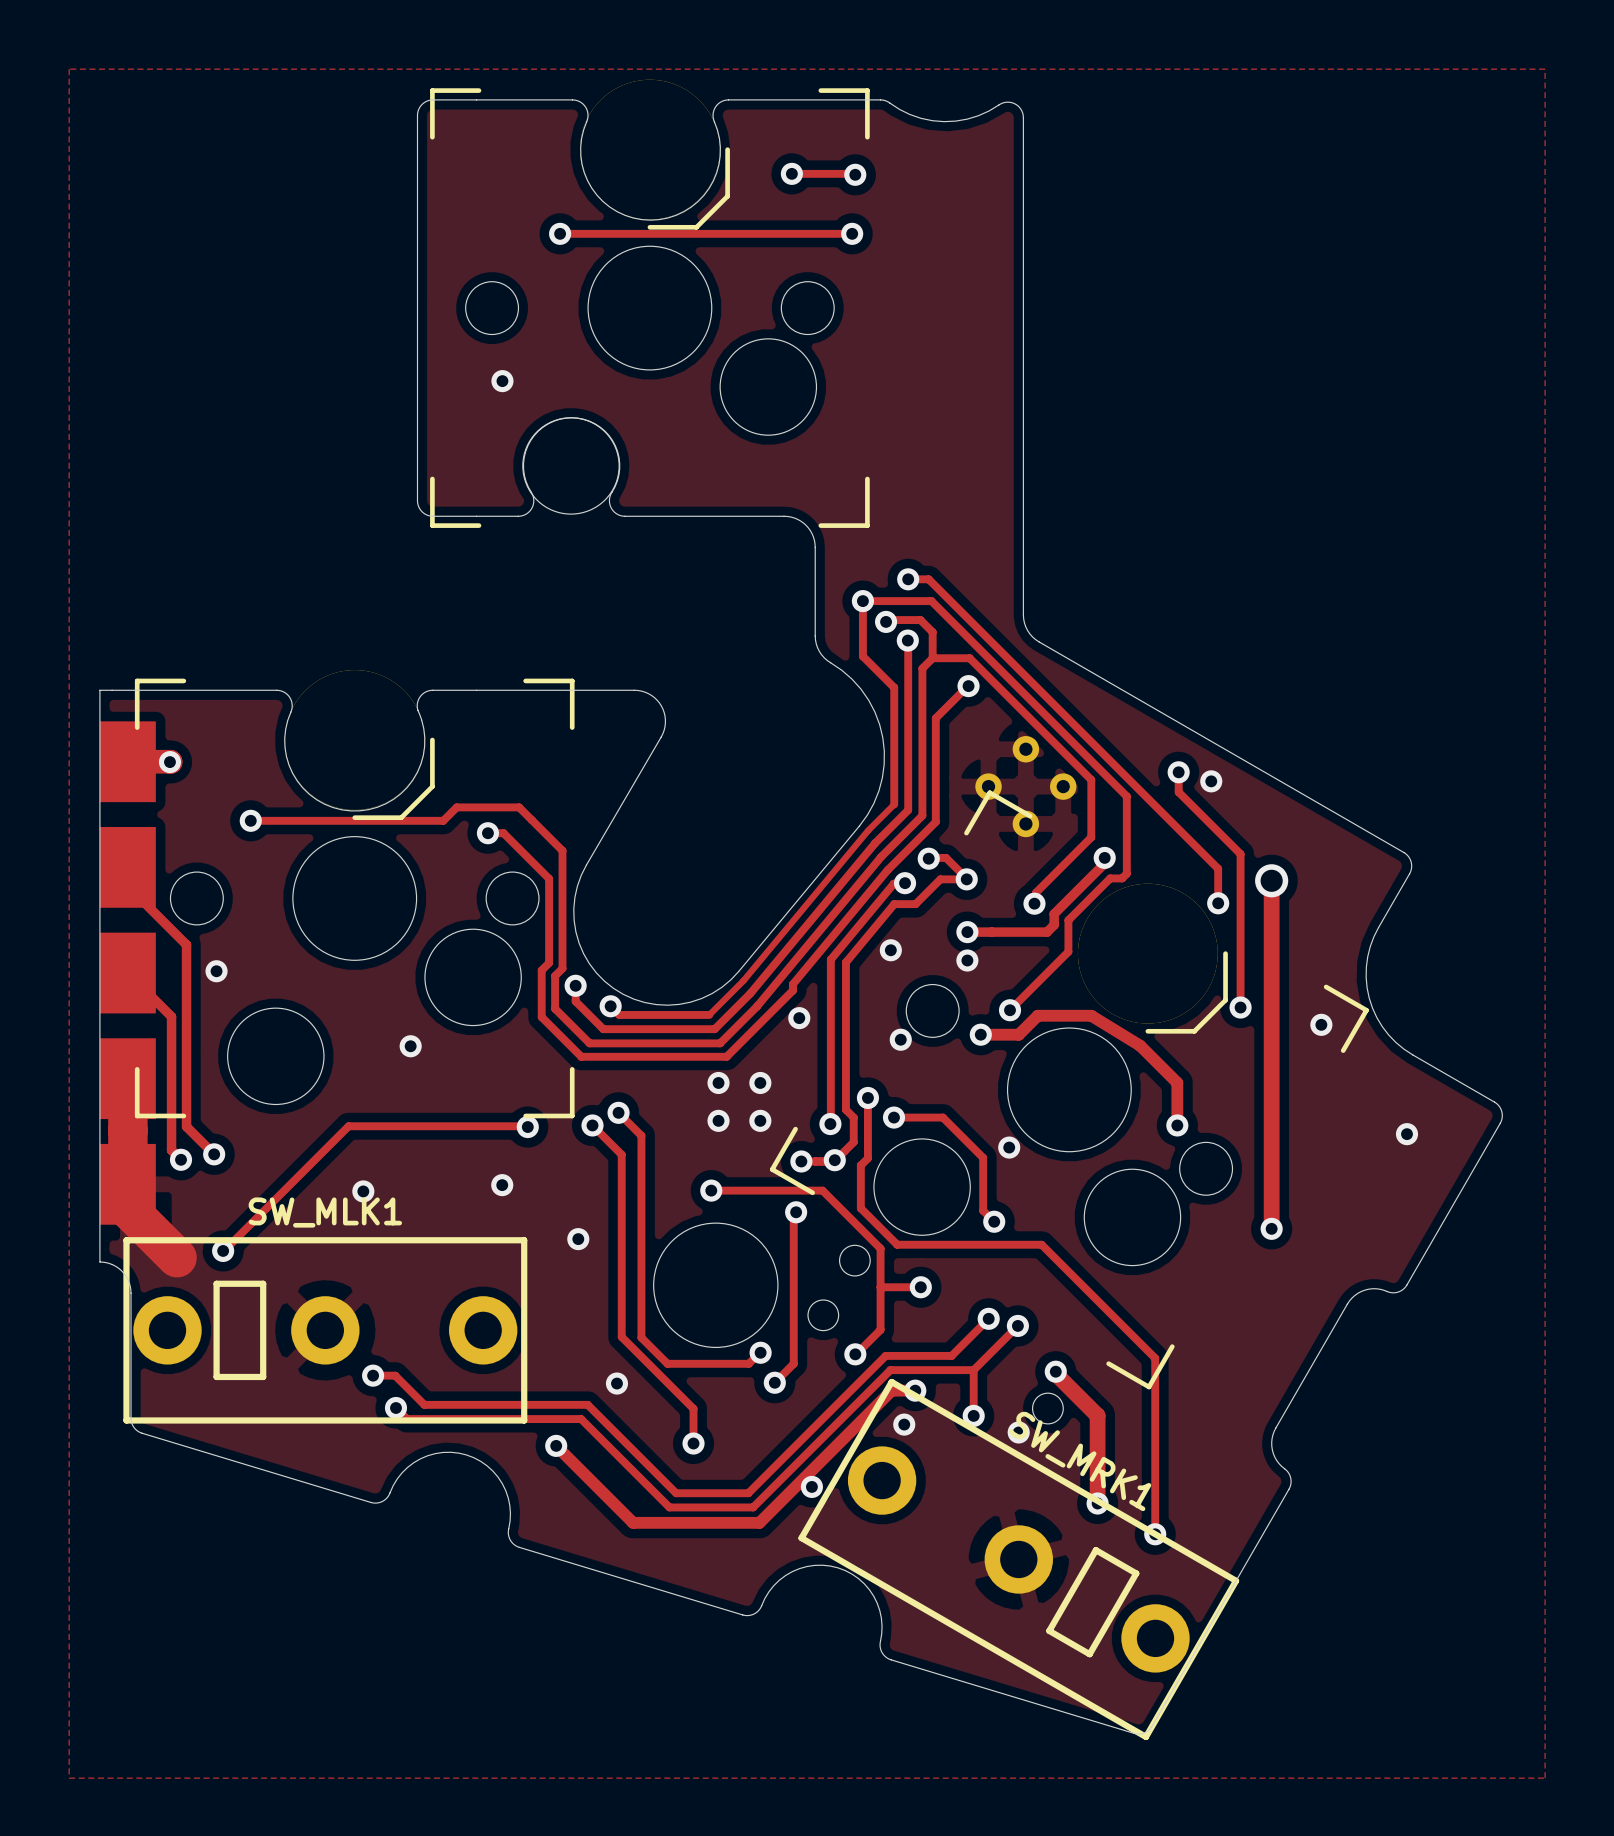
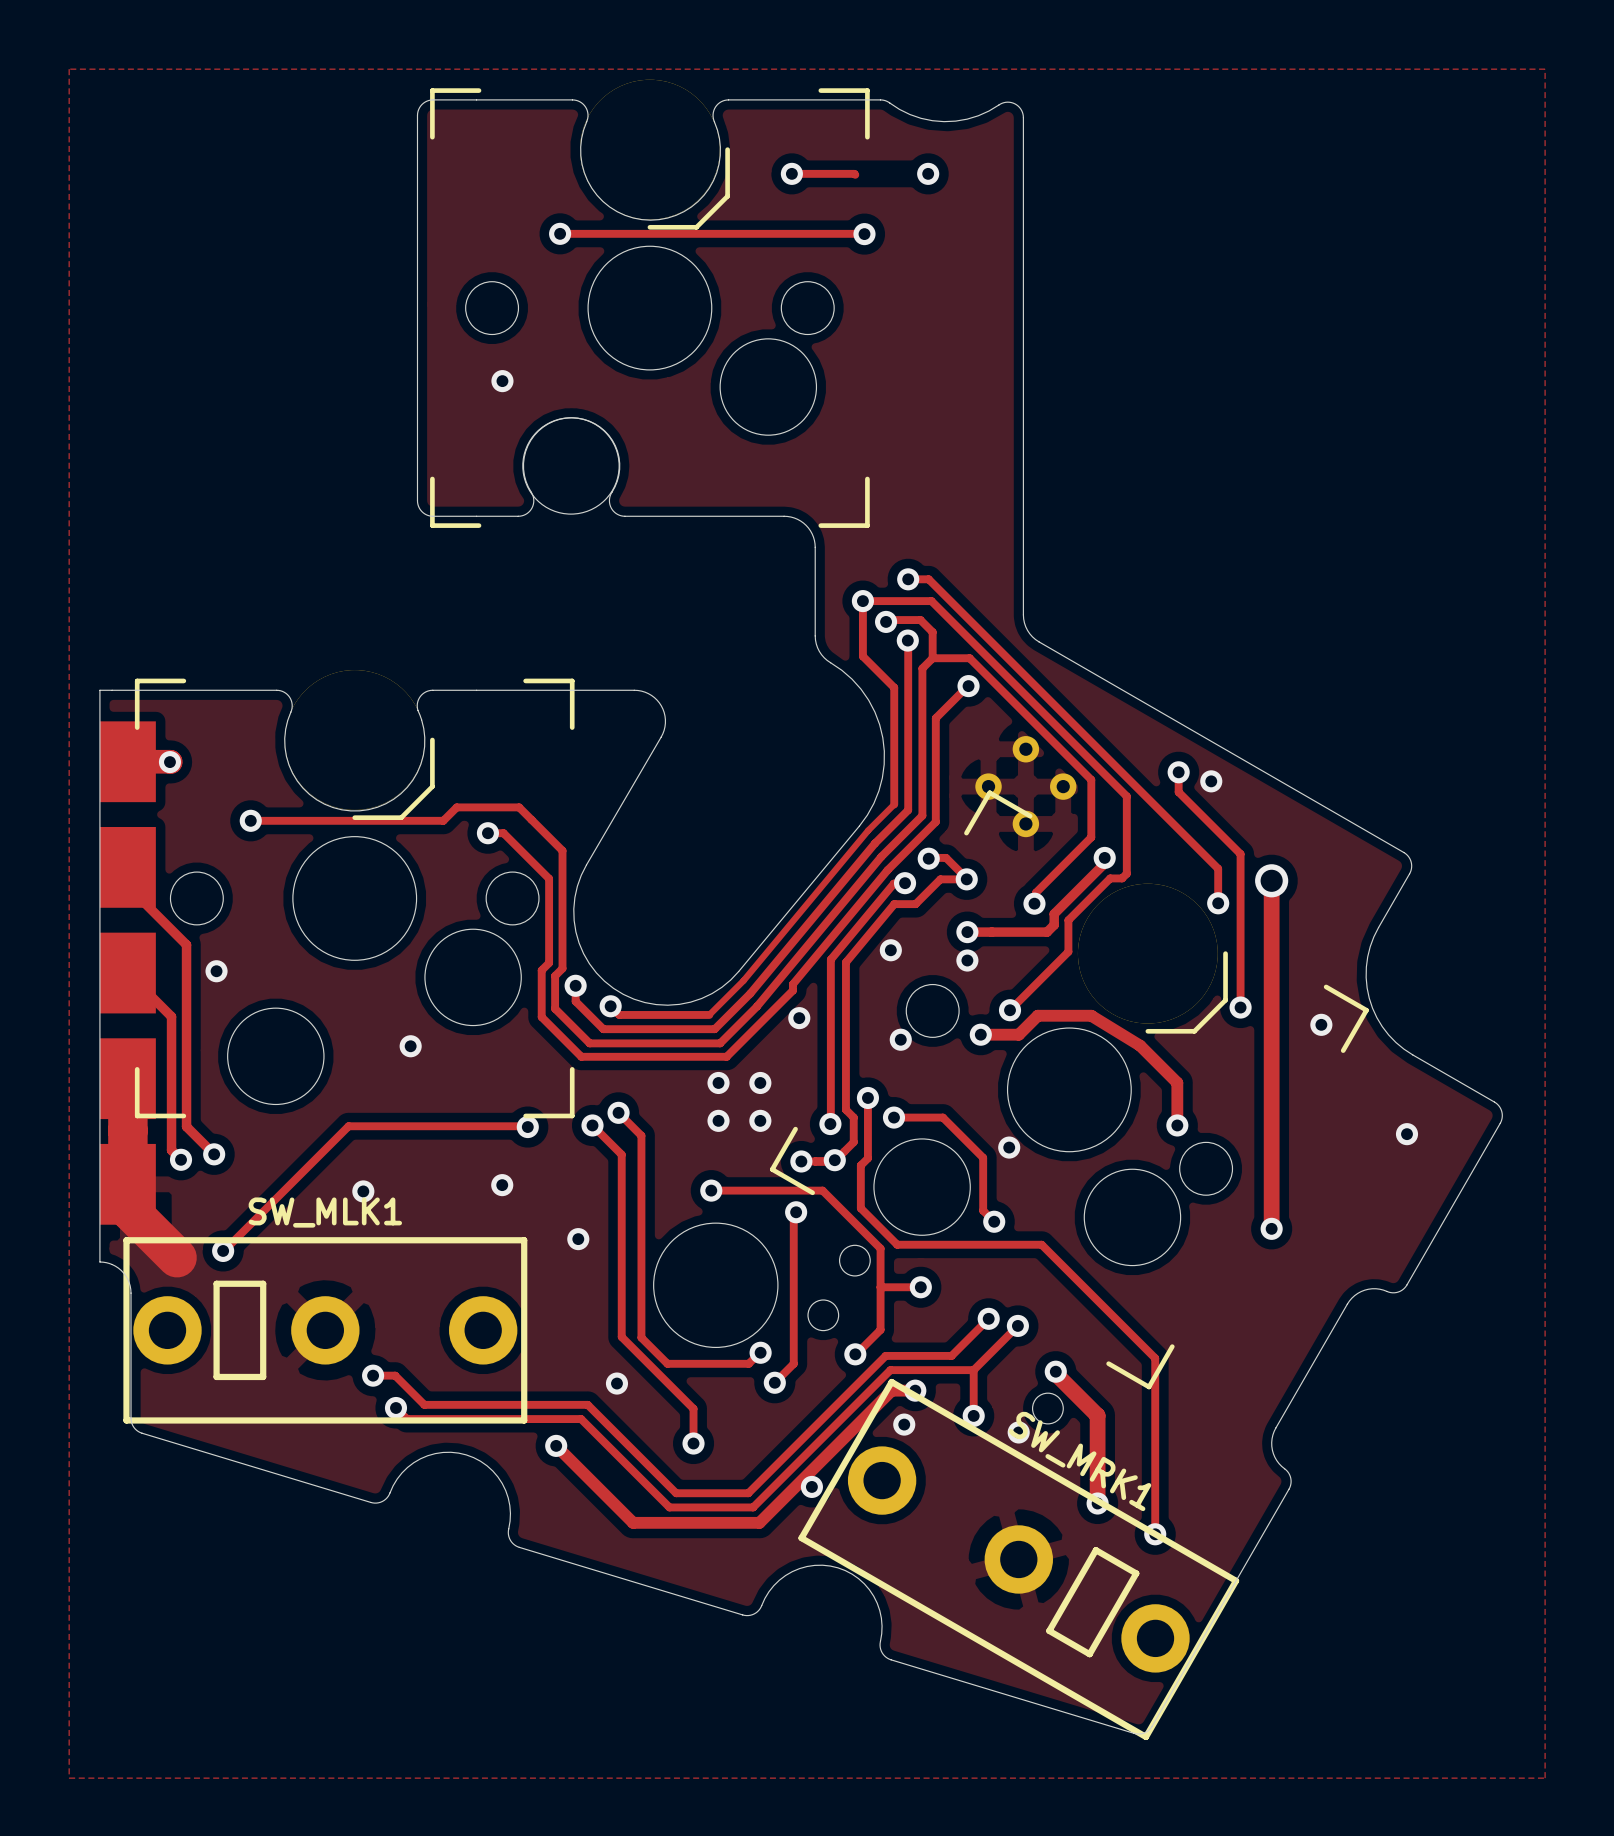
via: none -> (928, 173)
via: (855, 174) -> none
via position: (852, 233) -> (864, 234)

